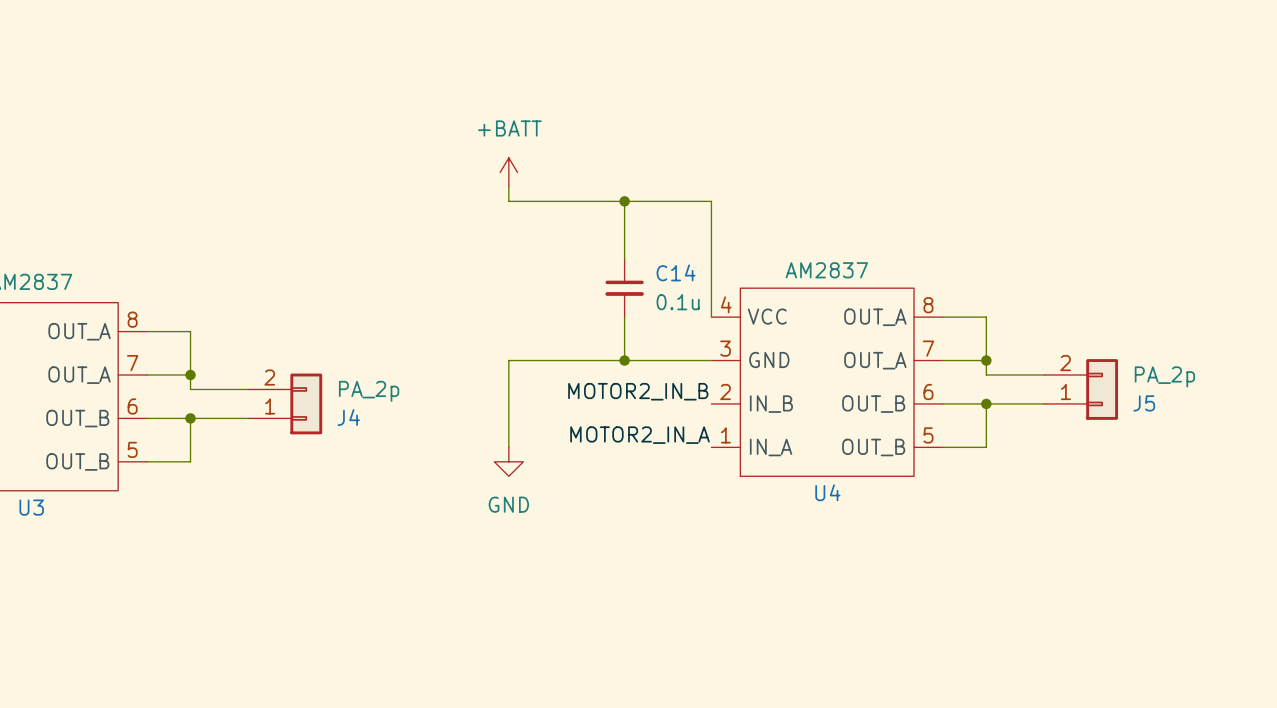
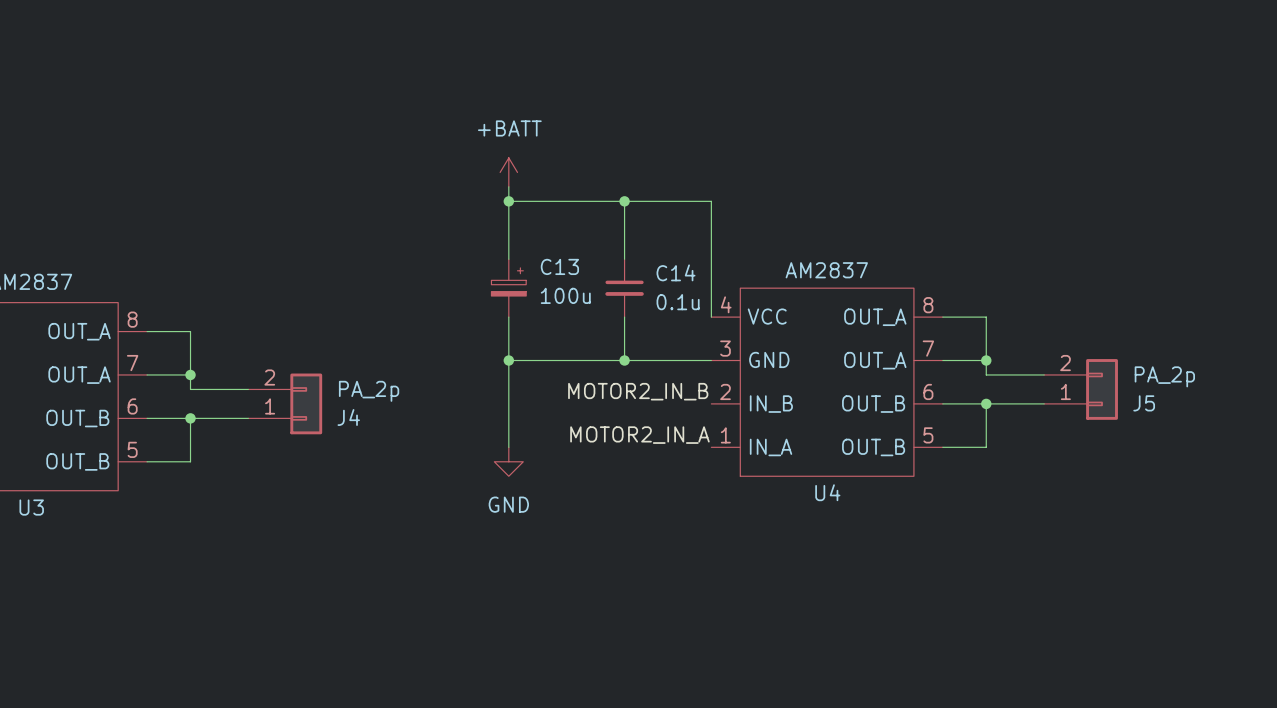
wire: none -> (508, 201) (508, 259)
junction: none -> (508, 201)
C13: none -> 100u (508, 288)
wire: none -> (508, 317) (508, 360)
junction: none -> (508, 360)

